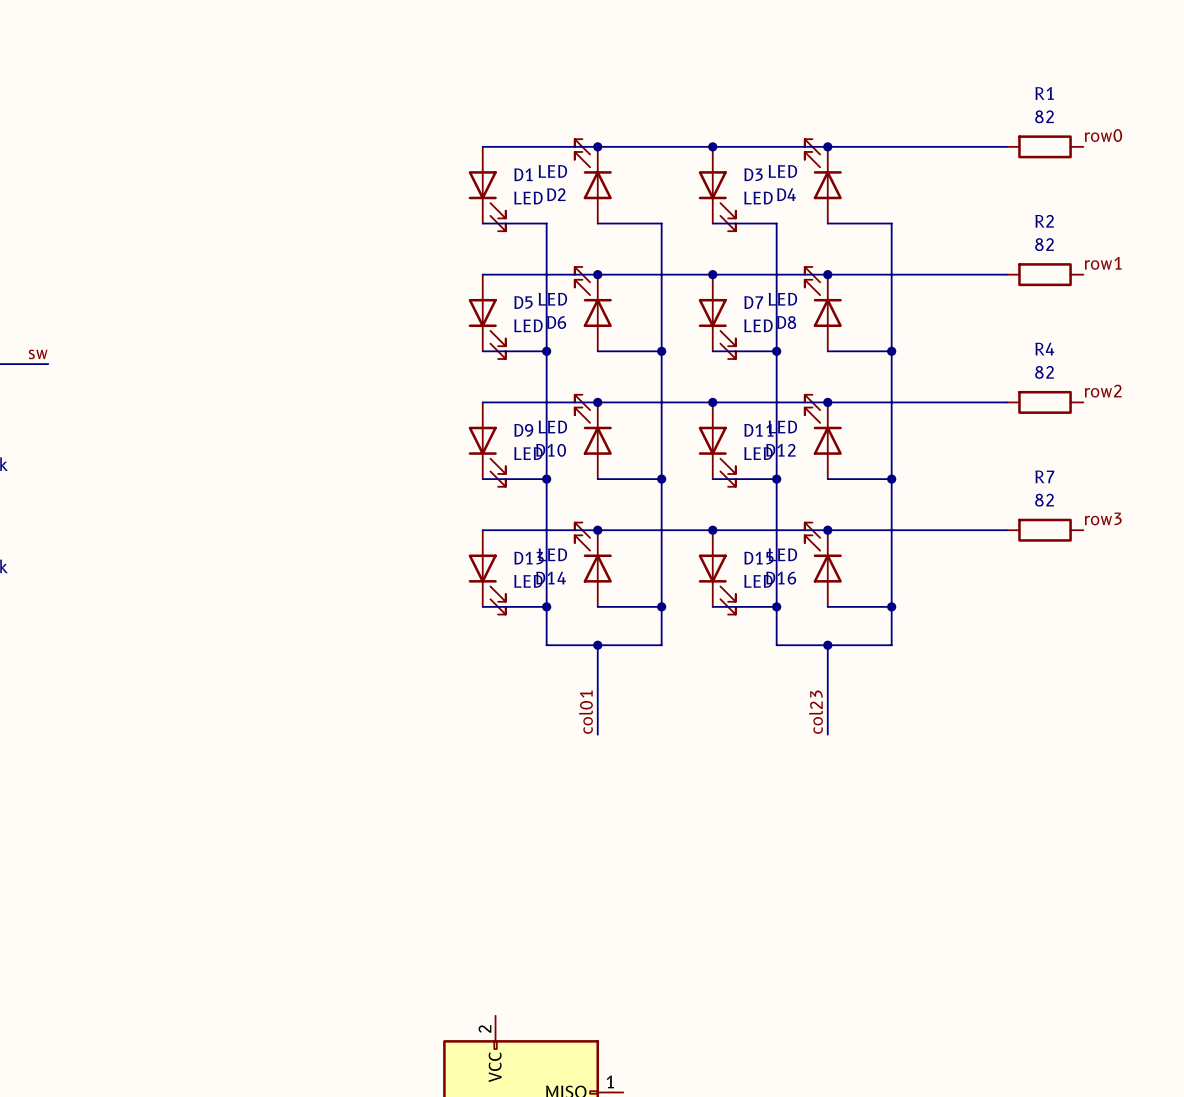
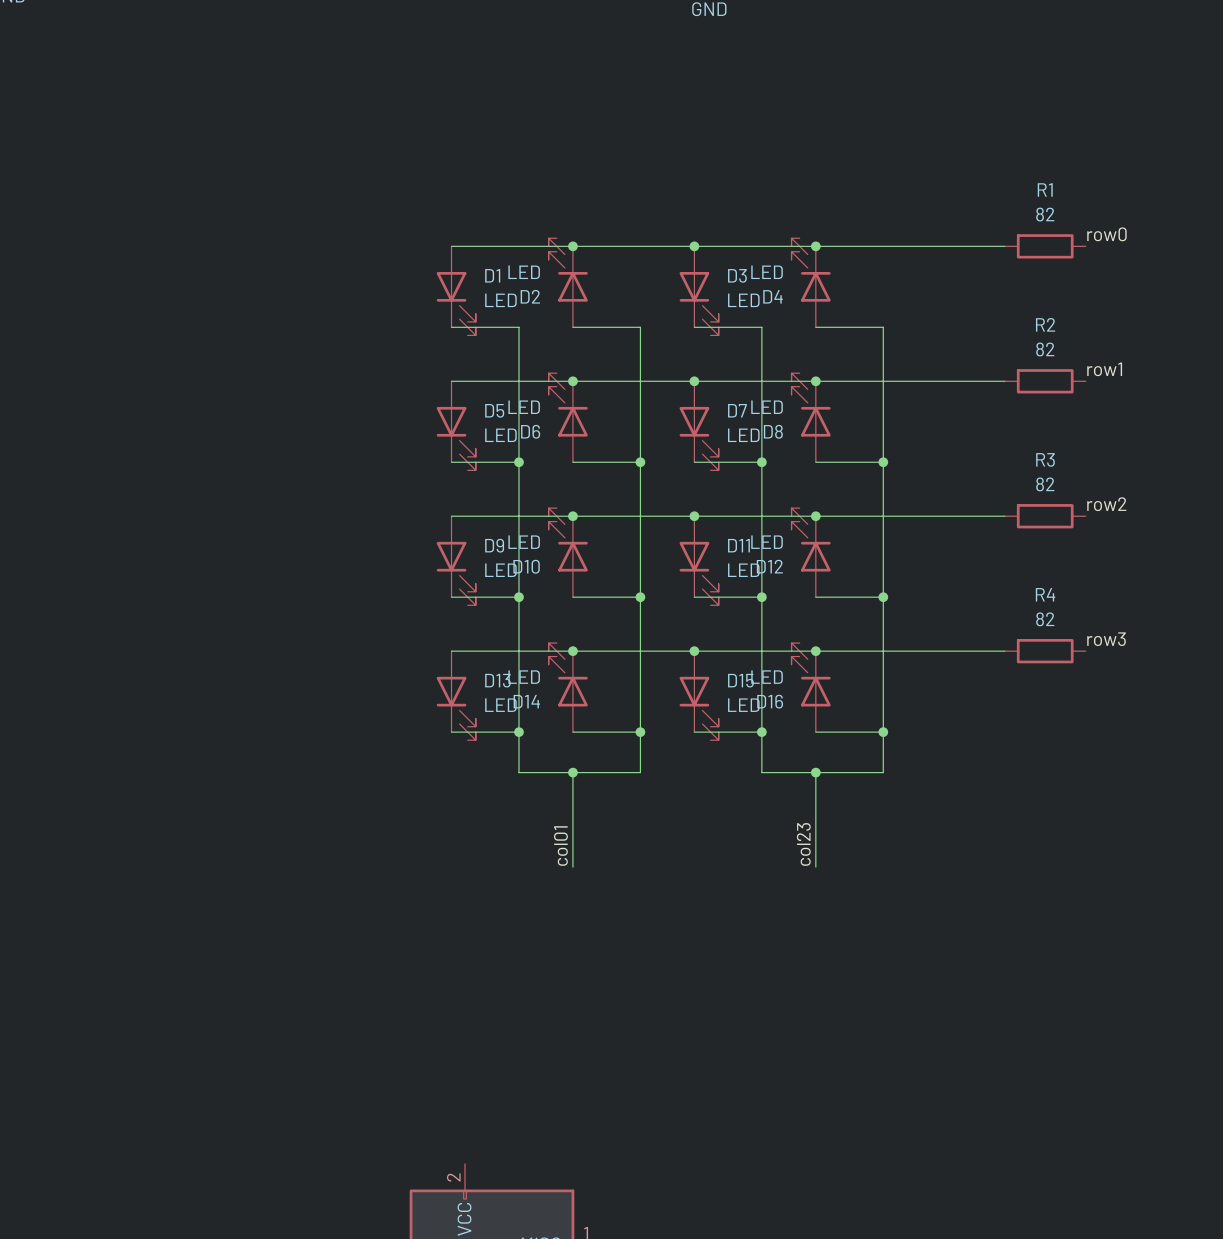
R4 name: R4 (1044, 349) -> R3 (1045, 459)
R7 name: R7 (1044, 476) -> R4 (1045, 594)

